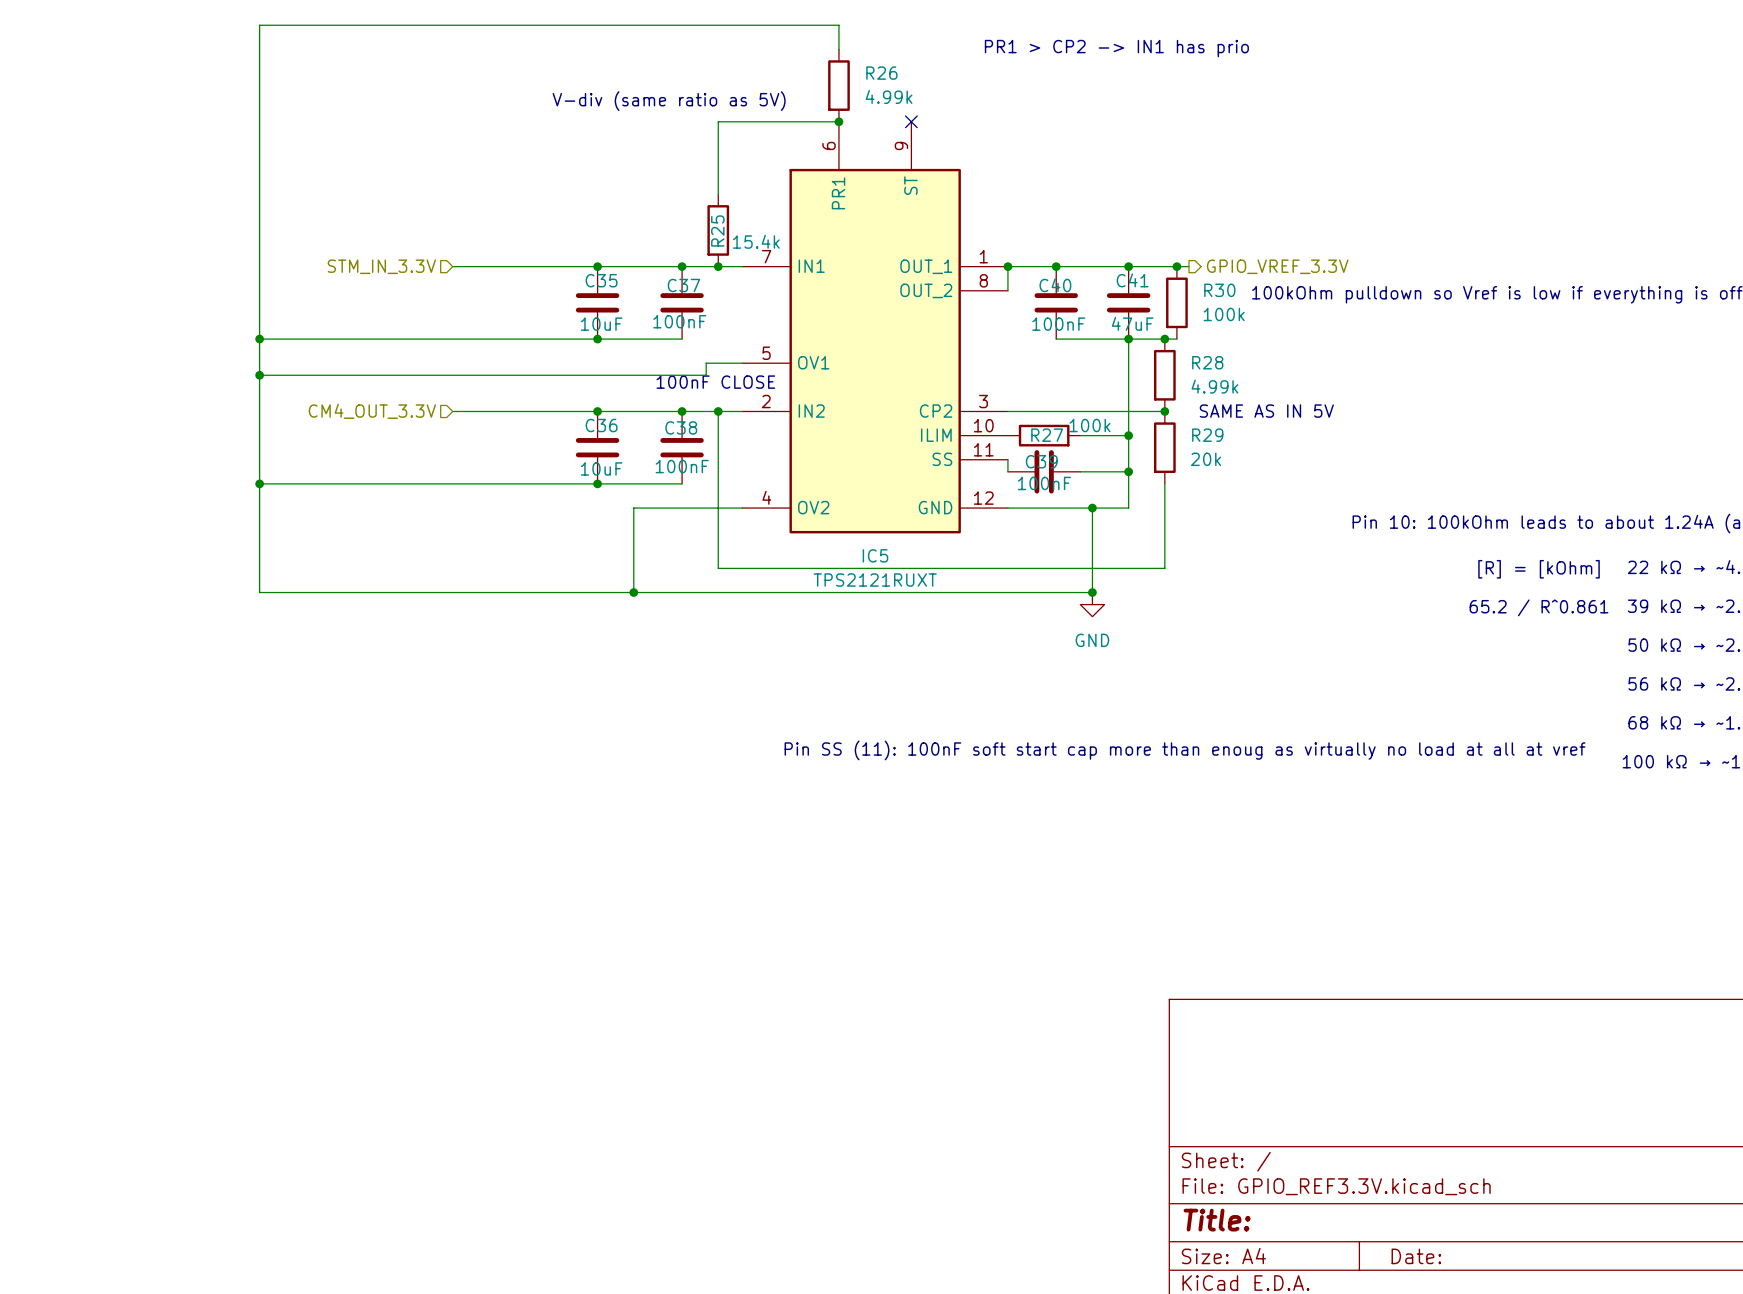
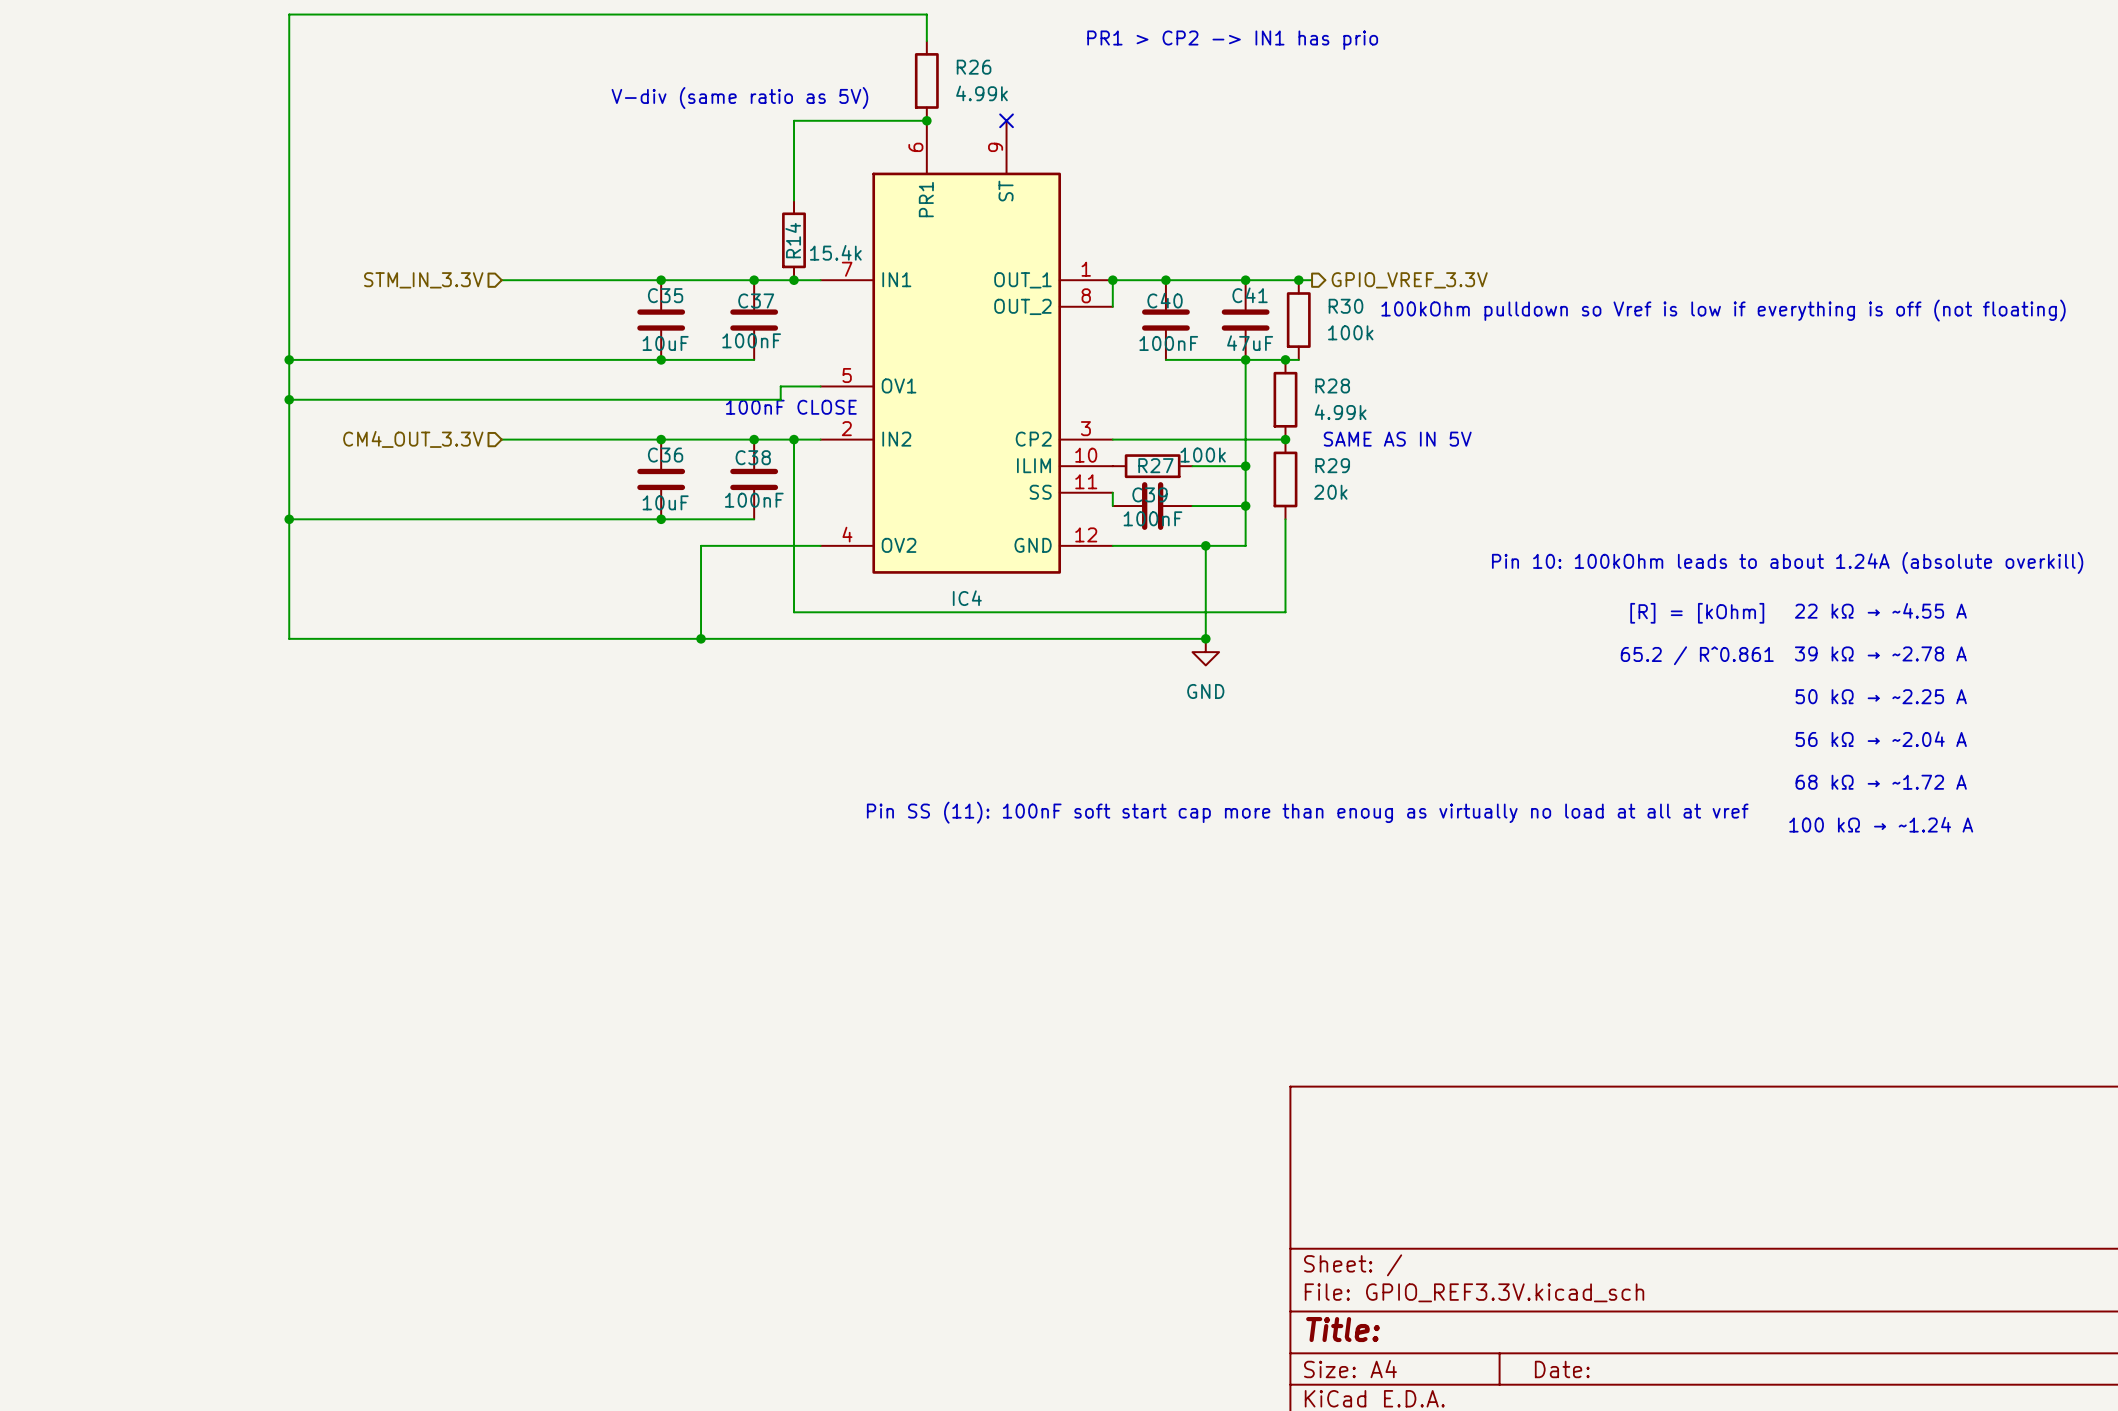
R25 name: R25 (717, 230) -> R14 (793, 240)
IC5 name: IC5 (875, 555) -> IC4 (967, 598)
IC5 value: TPS2121RUXT (875, 580) -> none

